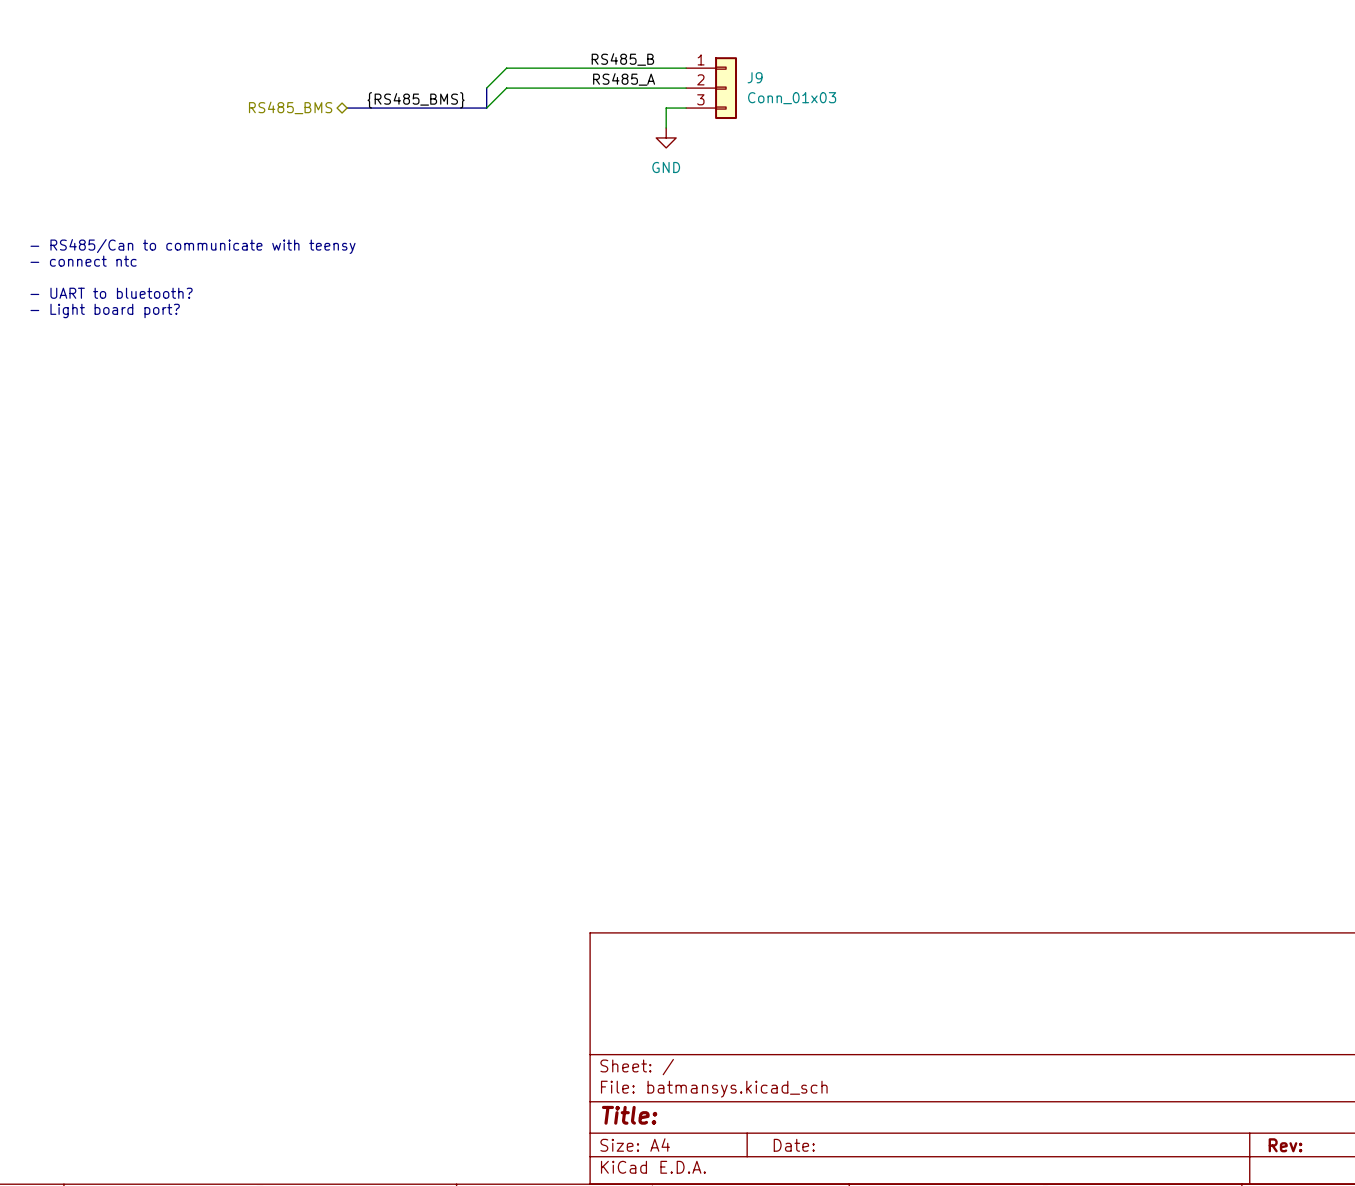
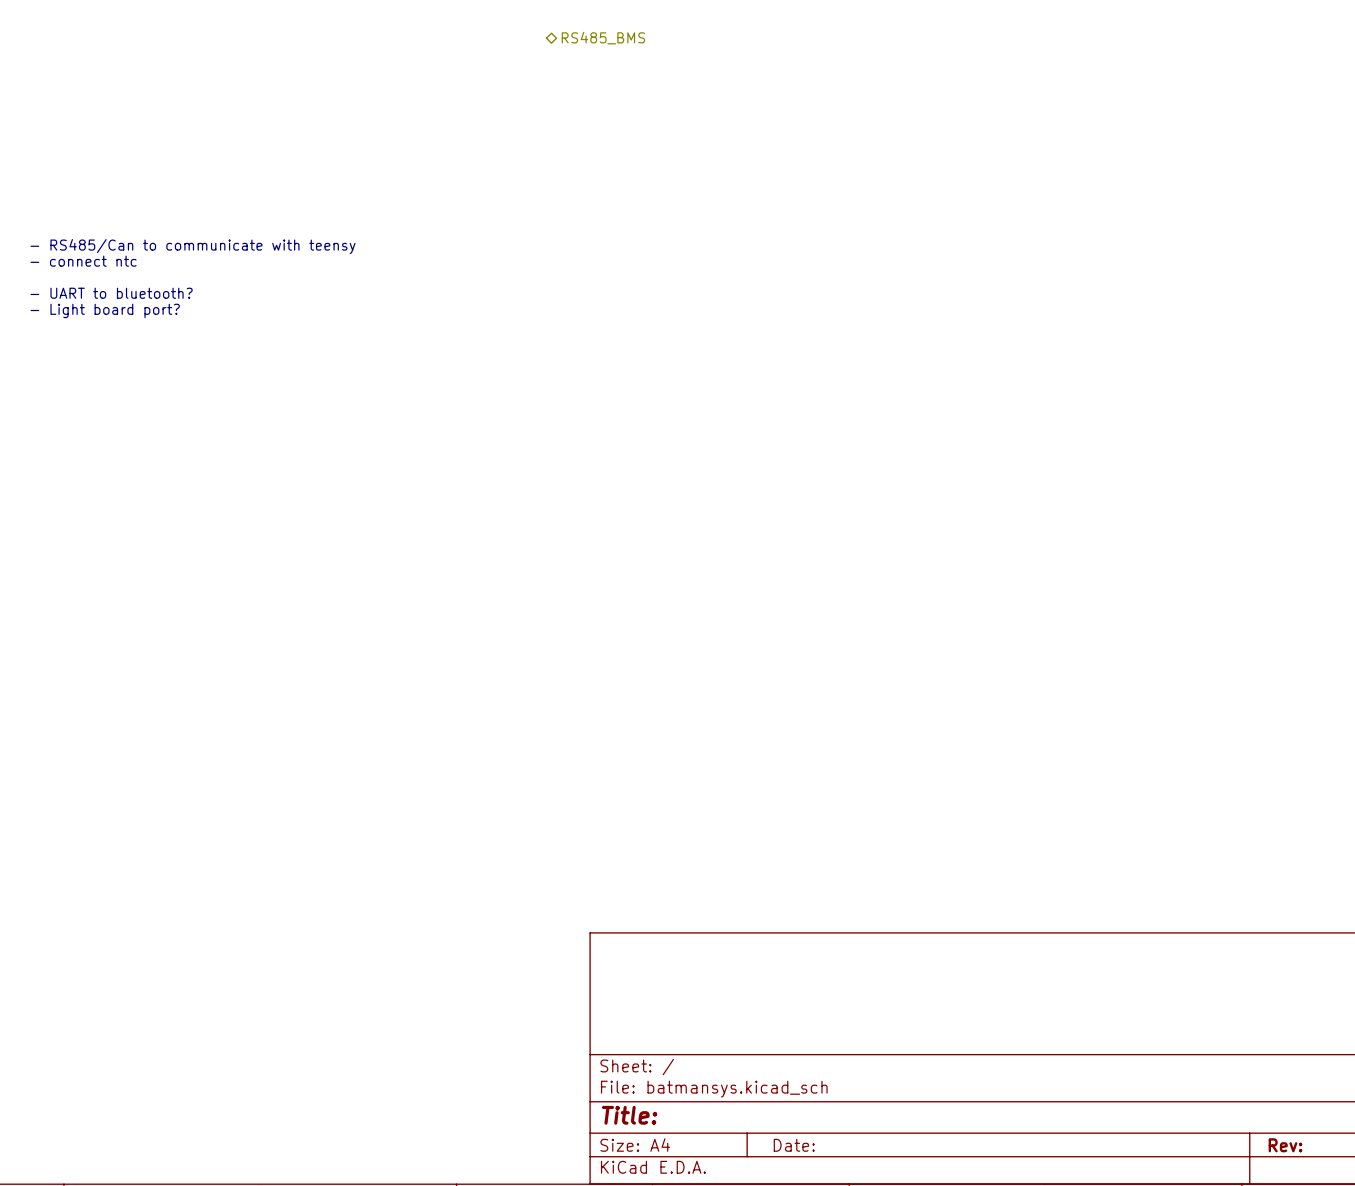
hierarchical label: none -> RS485_BMS (603, 38)
label: RS485_B (622, 59) -> none
wire: (686, 68) (506, 68) (486, 88) -> none
label: RS485_A (624, 79) -> none
bus: (486, 88) (486, 108) (347, 108) -> none
wire: (686, 88) (506, 88) (486, 108) -> none
J9: Conn_01x03 (711, 88) -> none
label: {RS485_BMS} (416, 100) -> none
hierarchical label: RS485_BMS (290, 107) -> none
wire: (686, 108) (666, 108) (666, 127) -> none
power symbol: GND (666, 137) -> none

